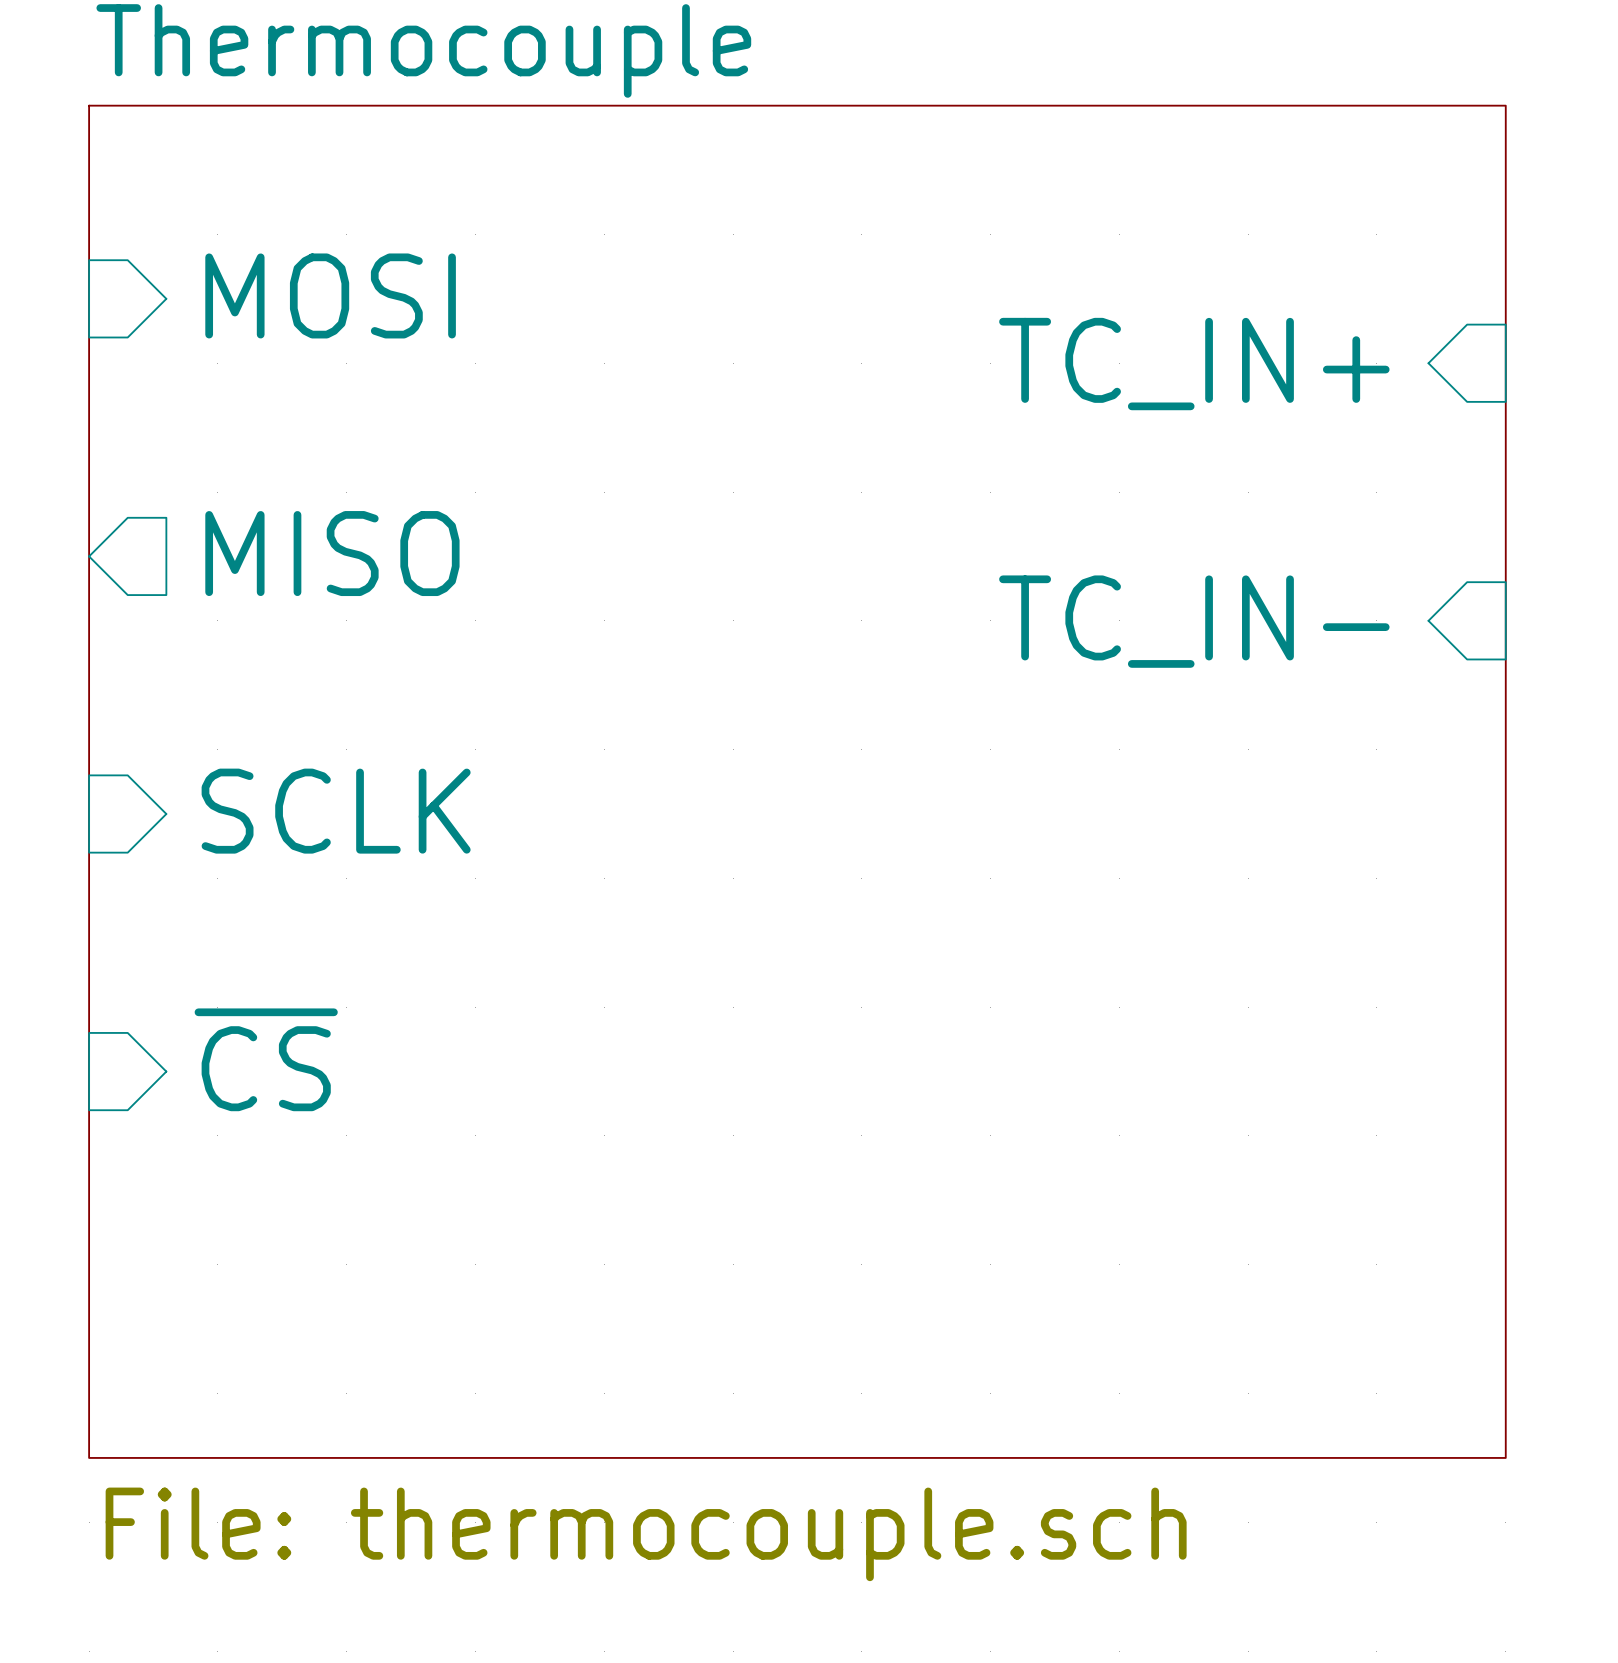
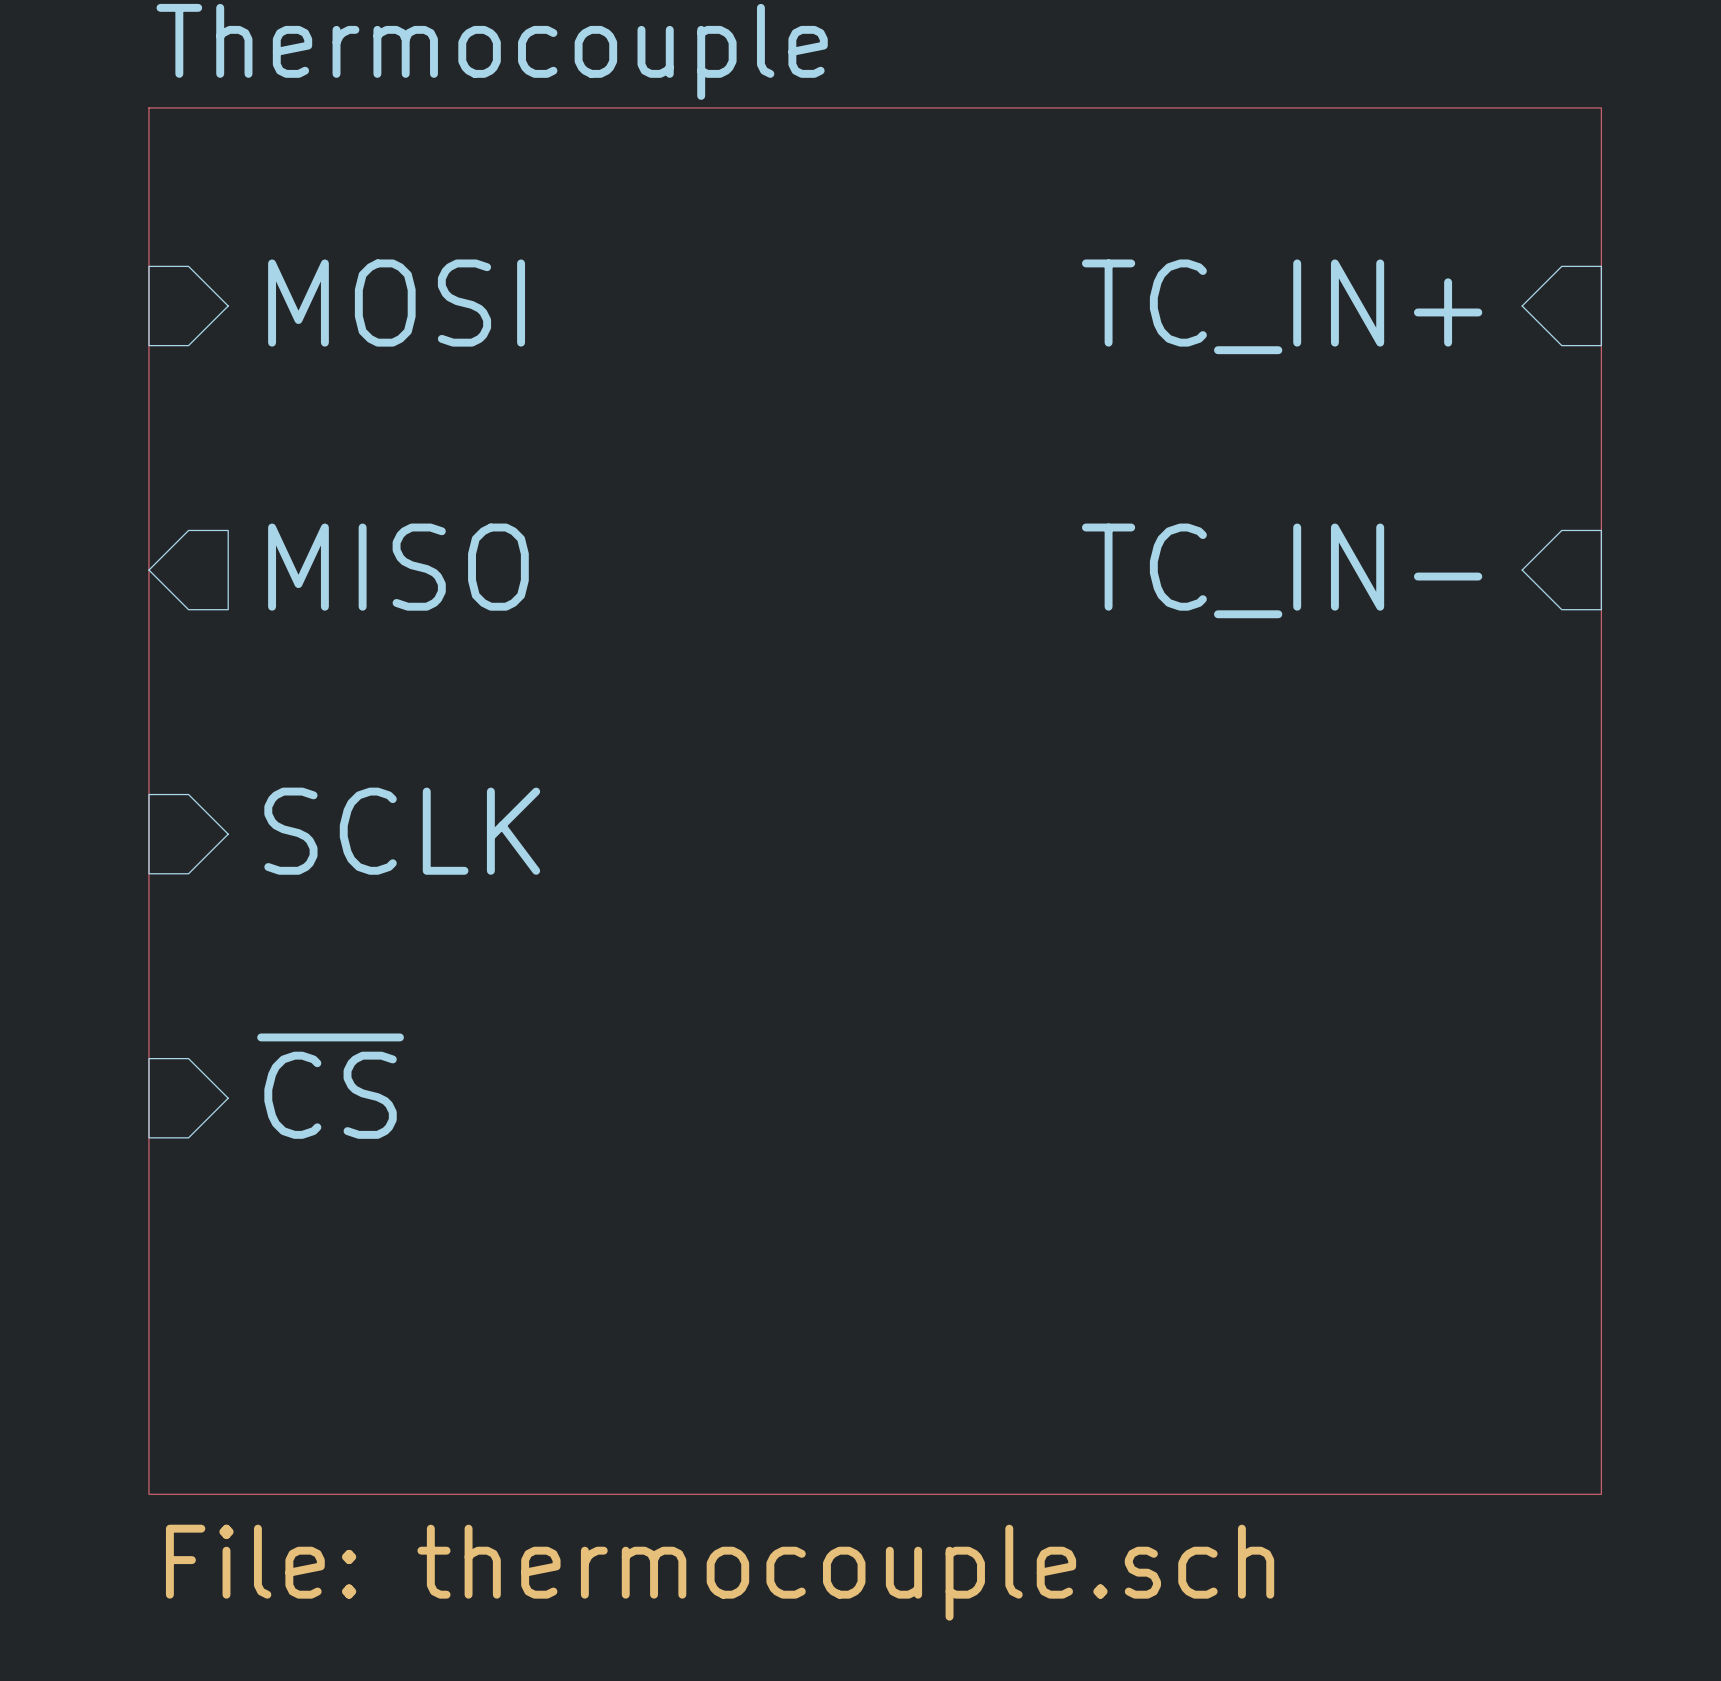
sheet pin position: TC_IN+ (1194, 364) -> TC_IN+ (1282, 306)
sheet pin position: TC_IN- (1194, 621) -> TC_IN- (1282, 570)

